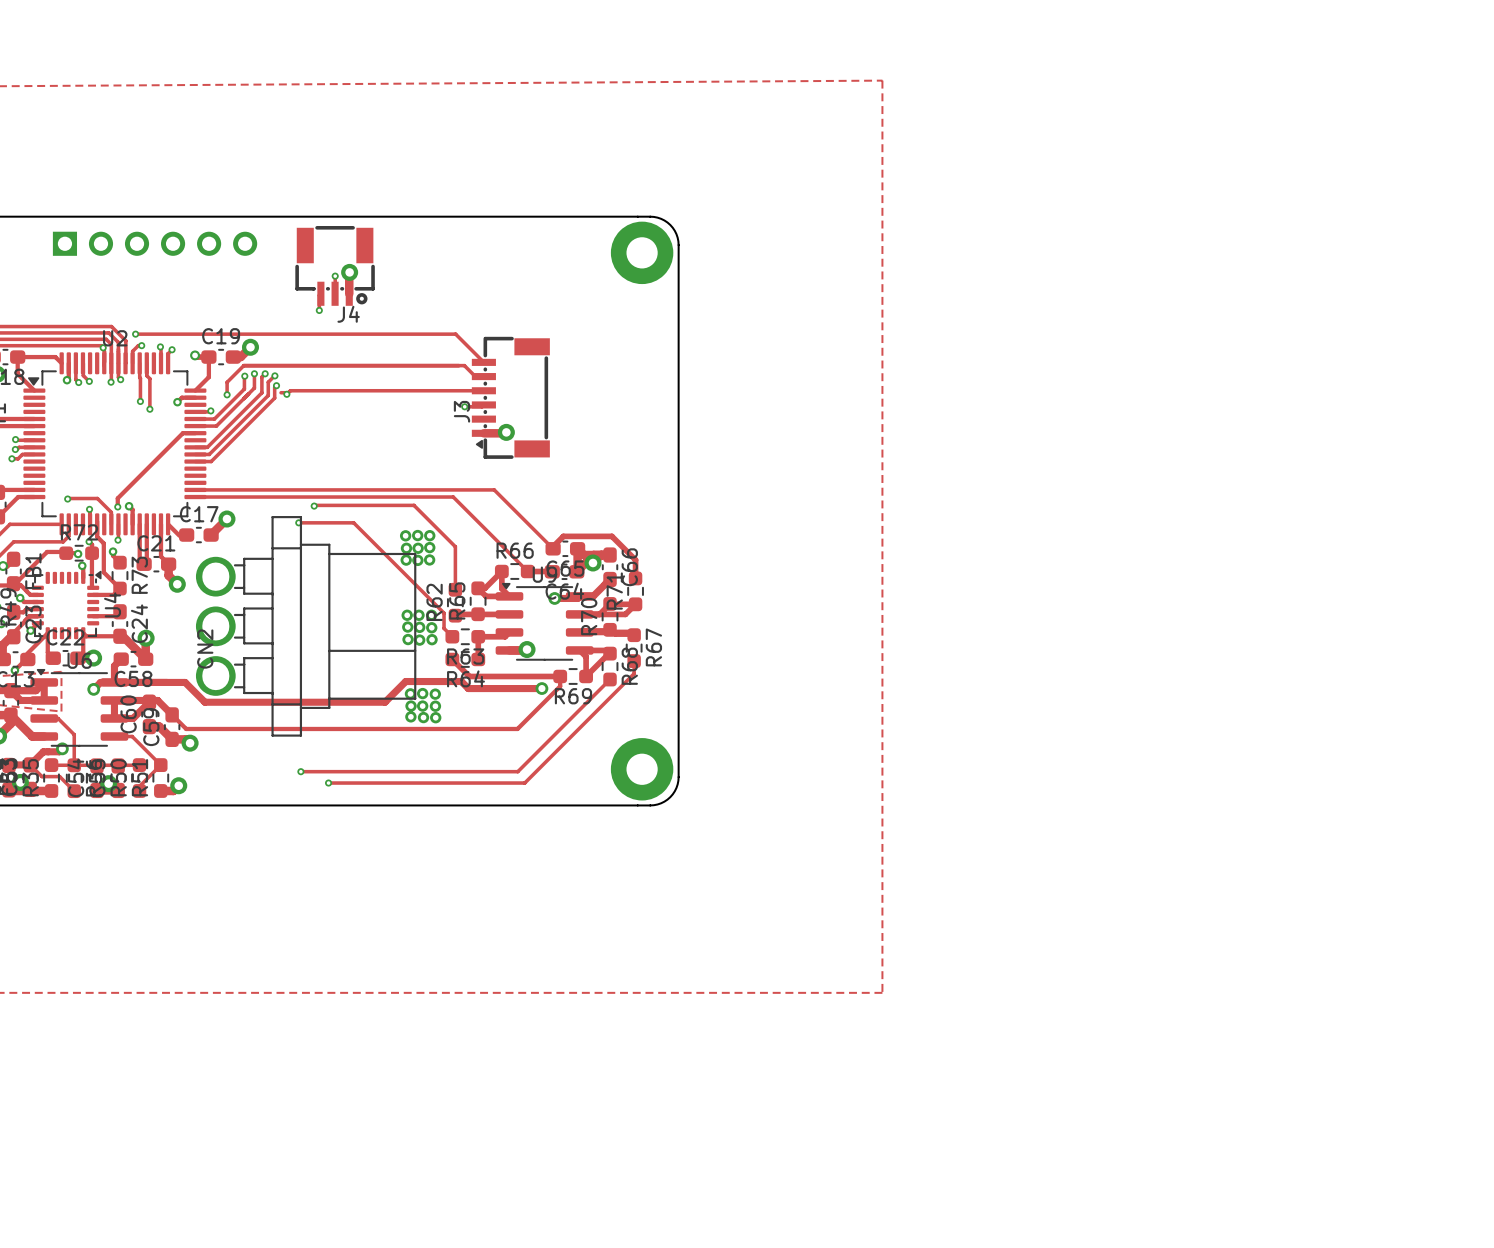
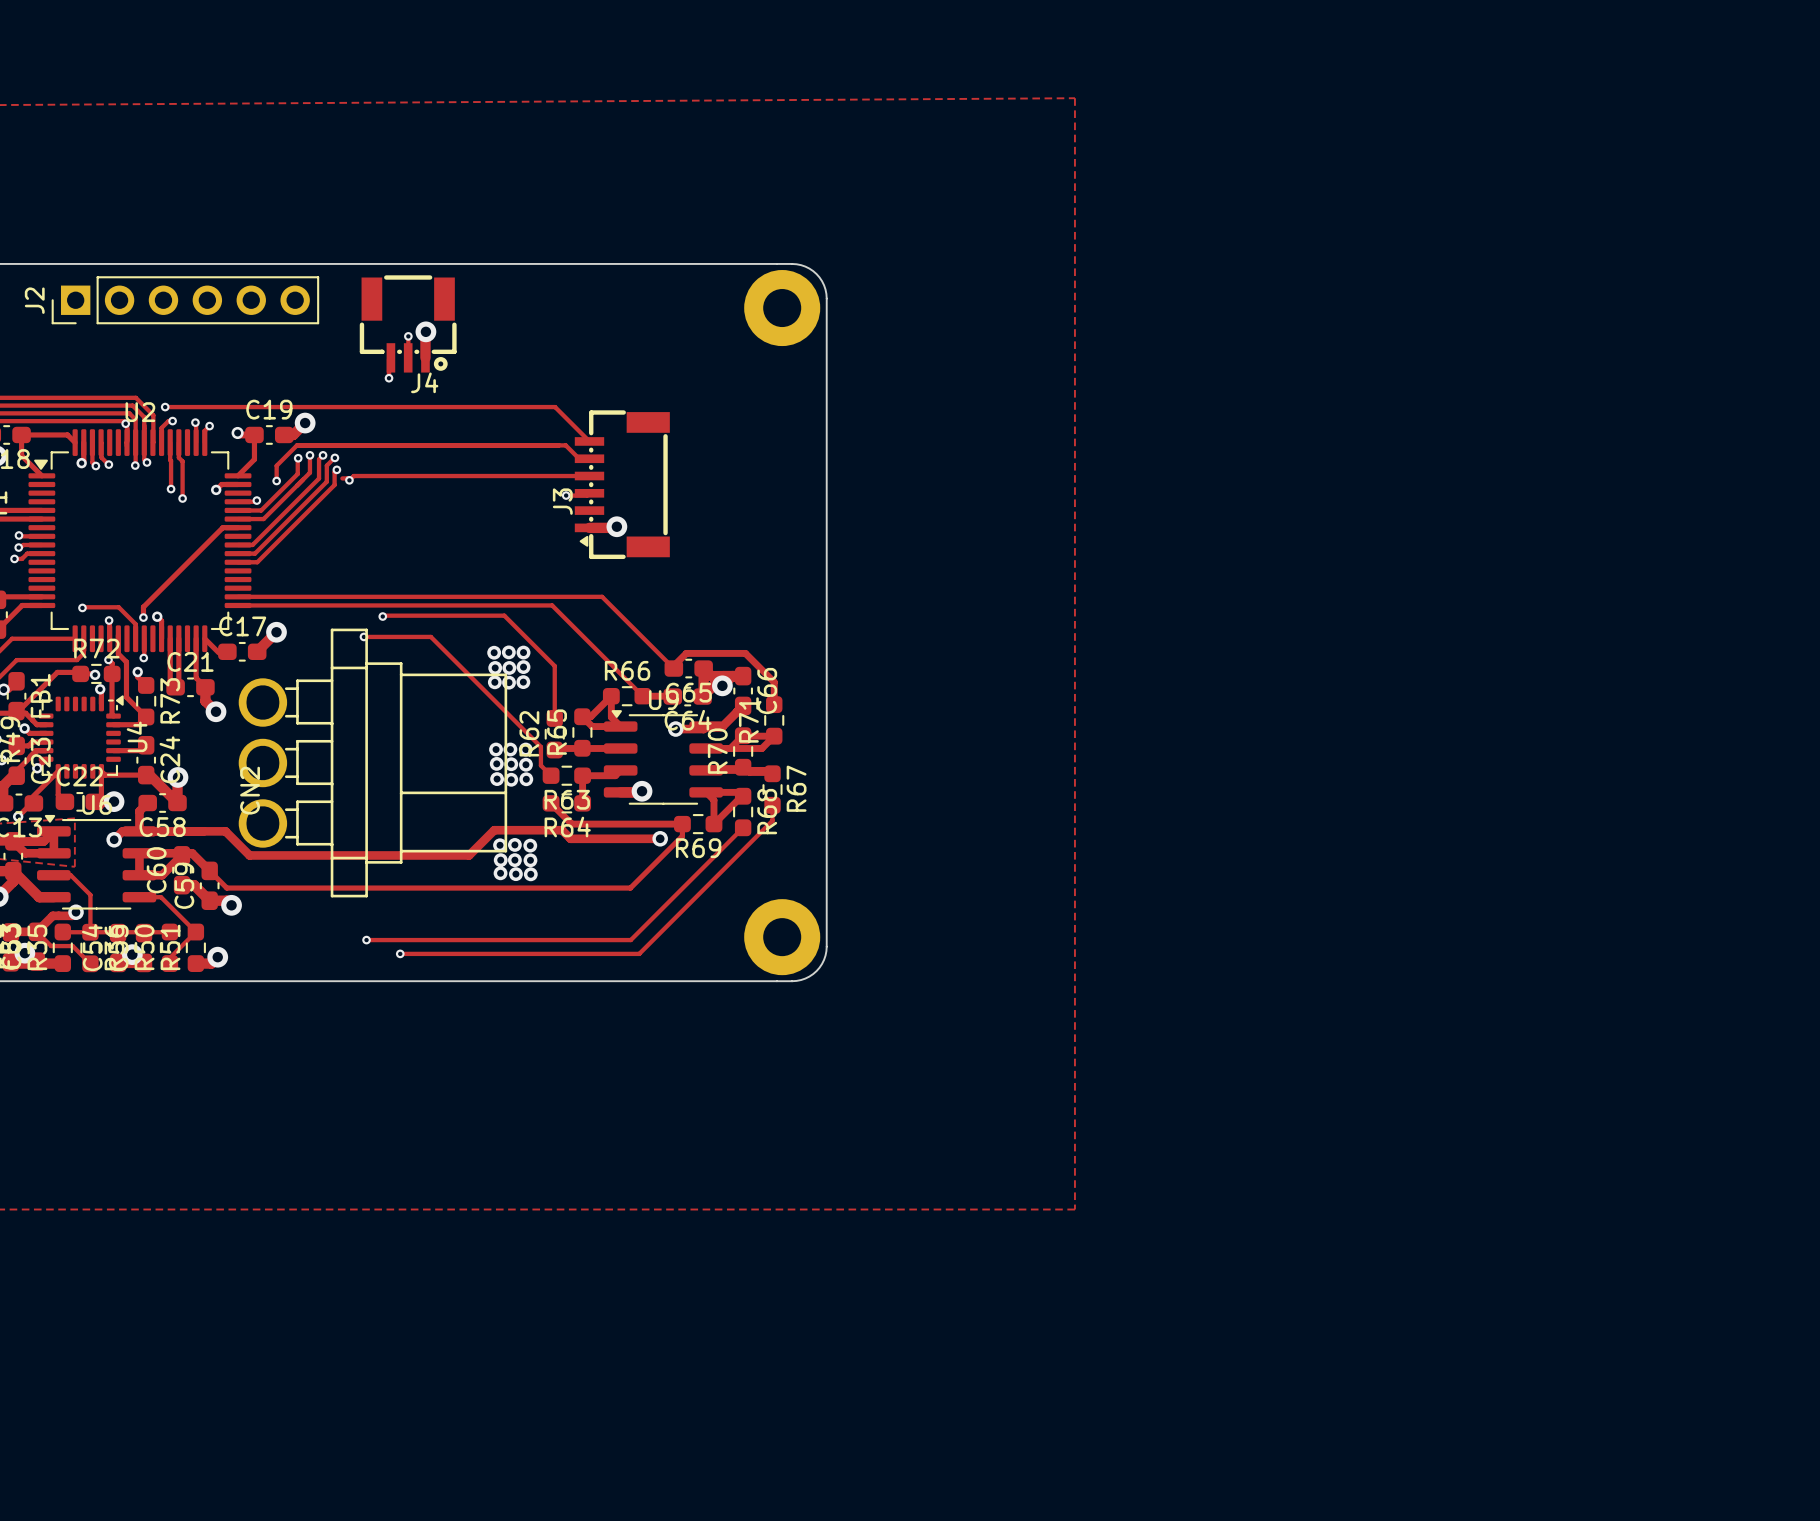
J2 side: bottom (155, 243) -> top (185, 300)

